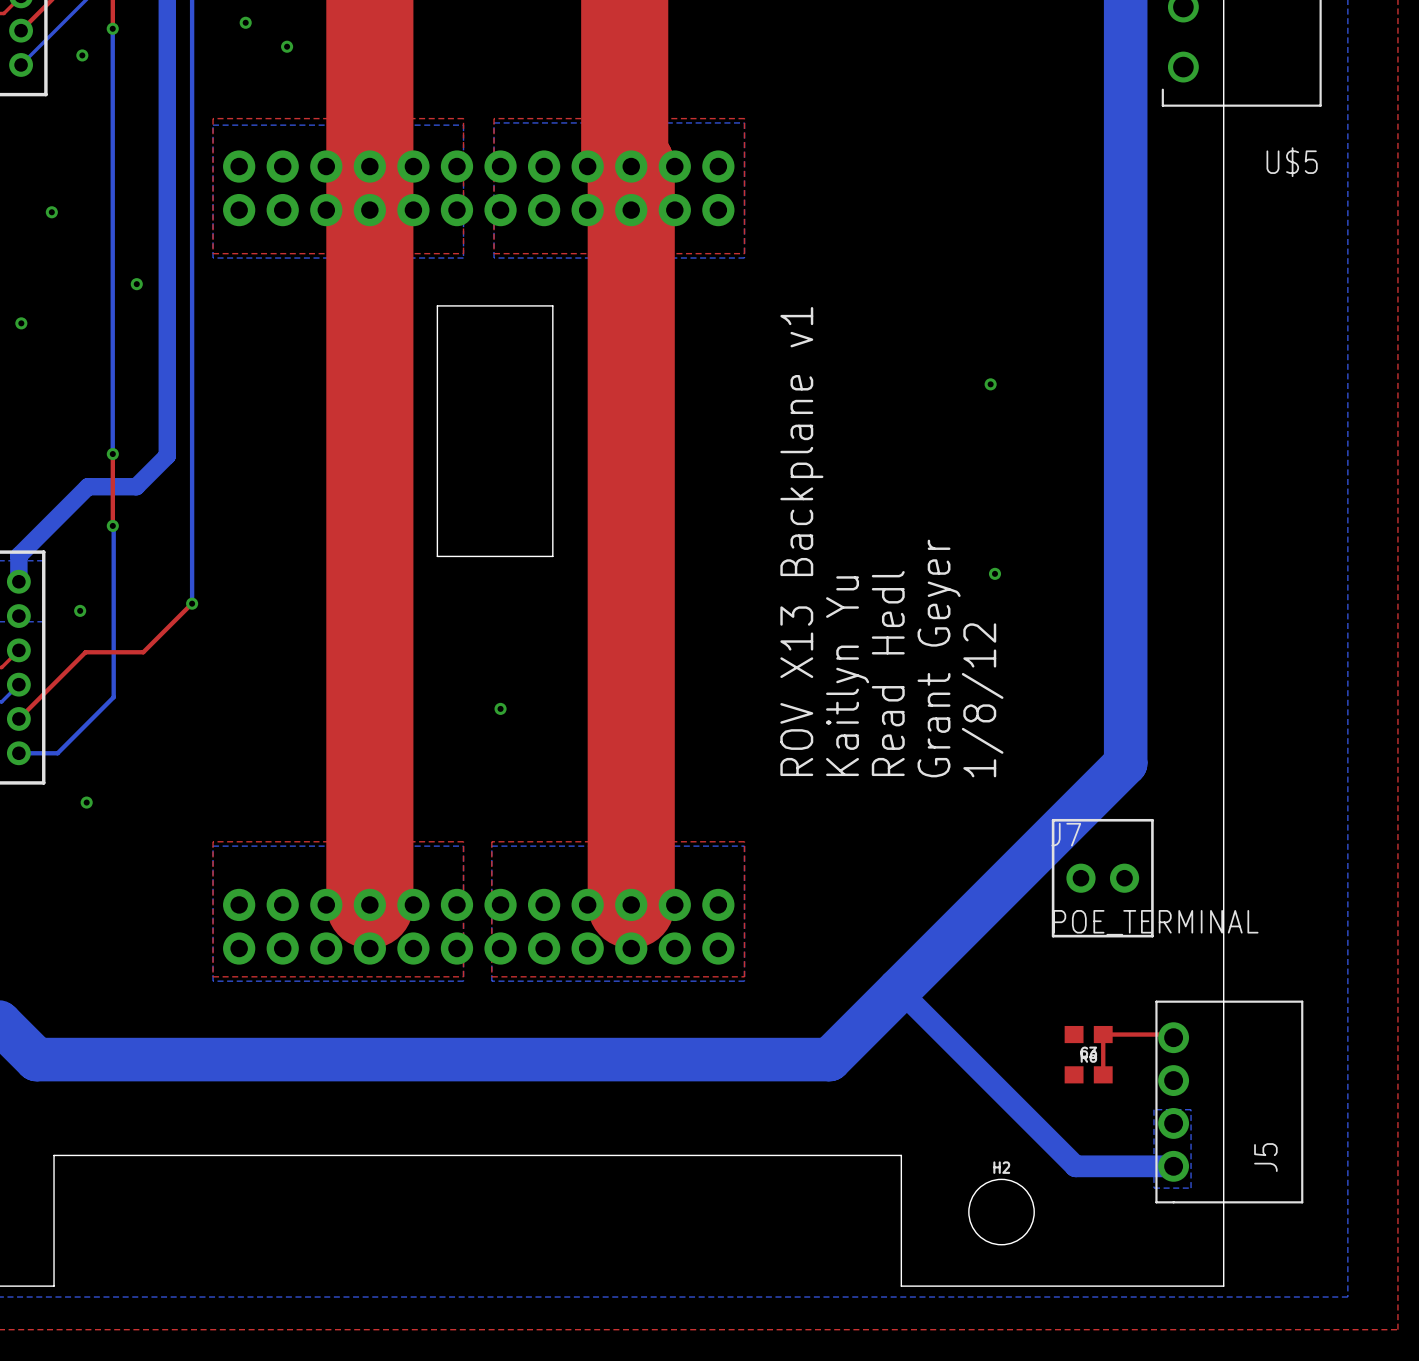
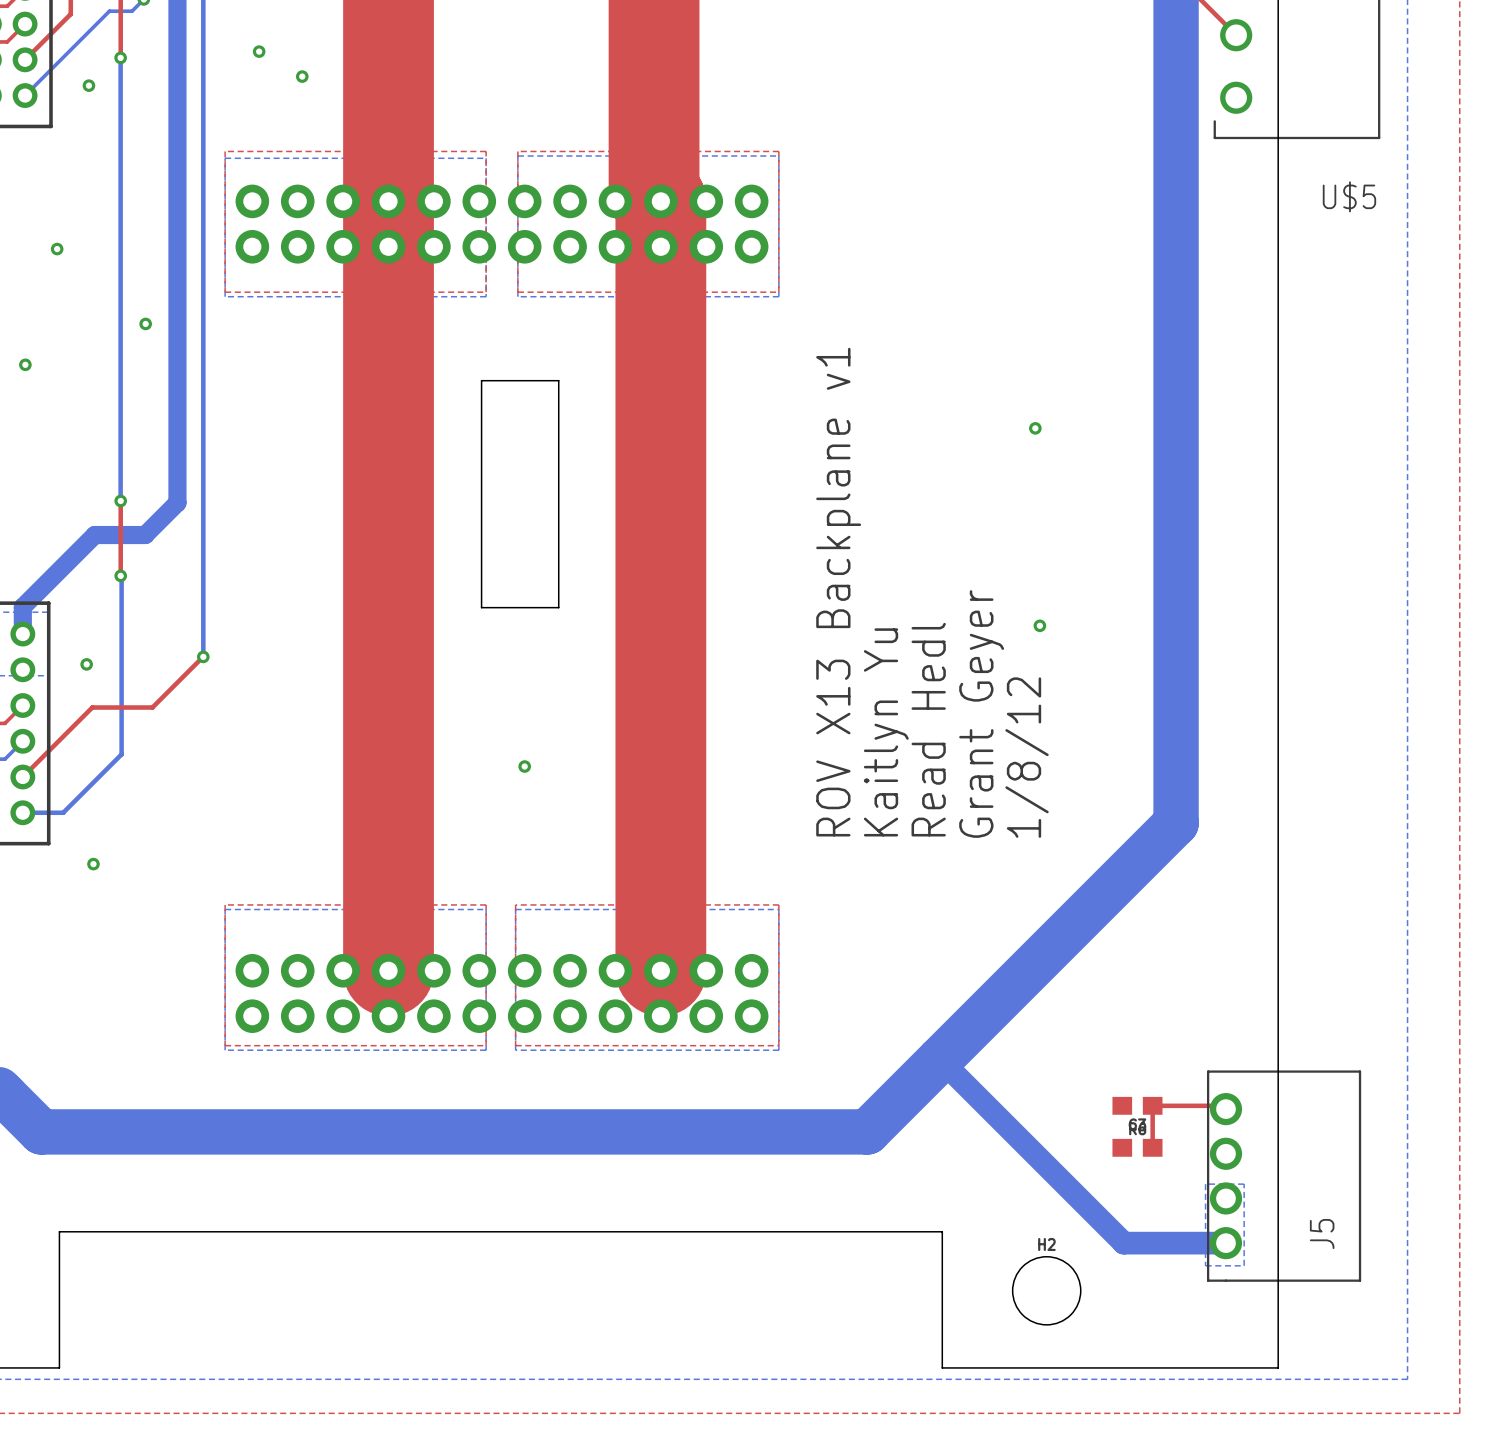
board edge: (459, 556) (437, 556) (437, 305) (552, 305) (552, 556) (533, 556) -> (481, 607) (481, 380) (558, 380) (558, 607)
J7: POE_TERMINAL (1102, 878) -> none

